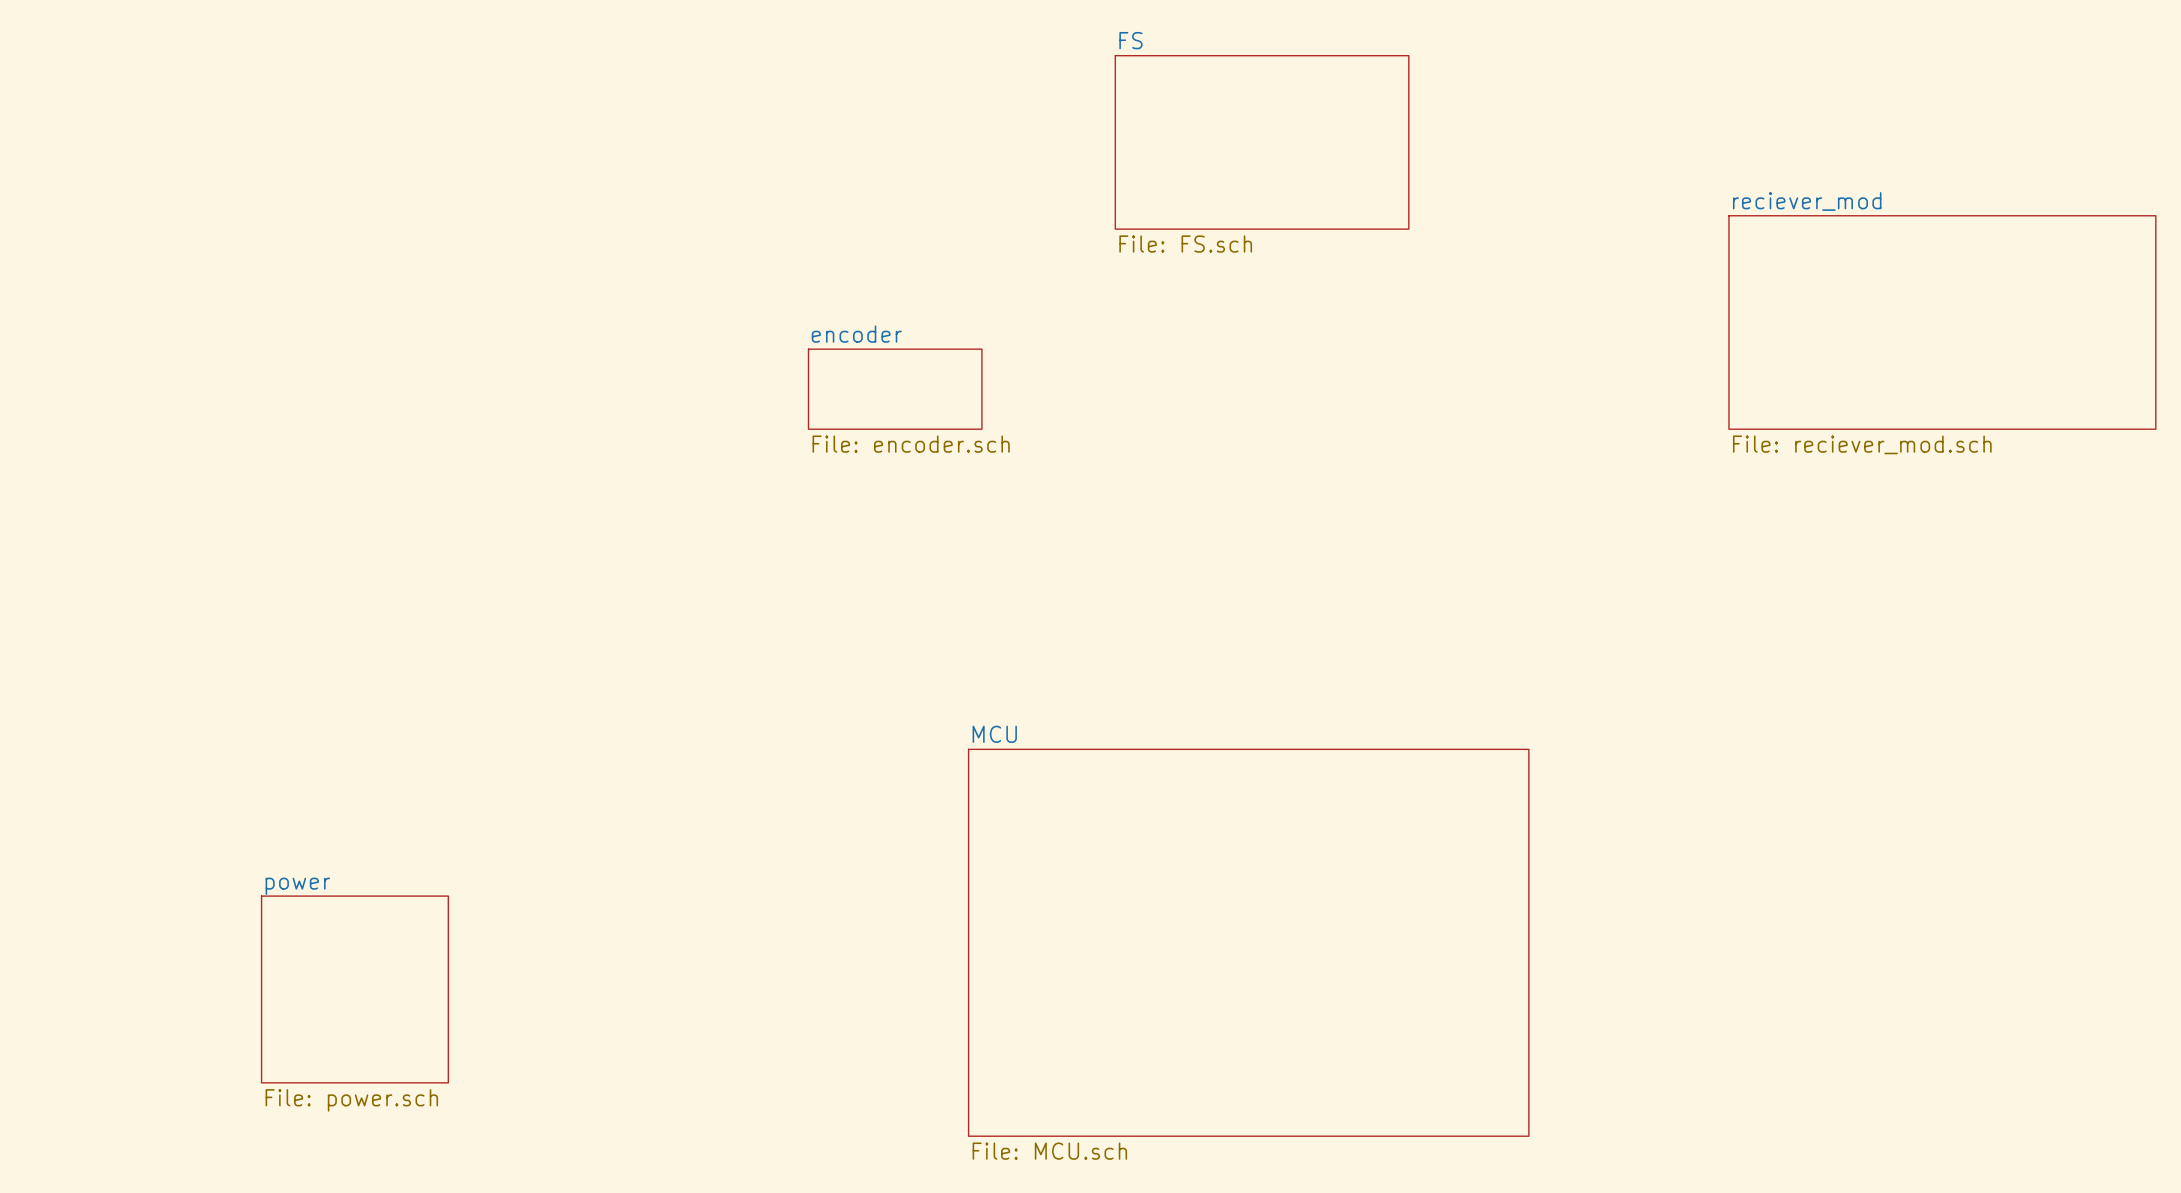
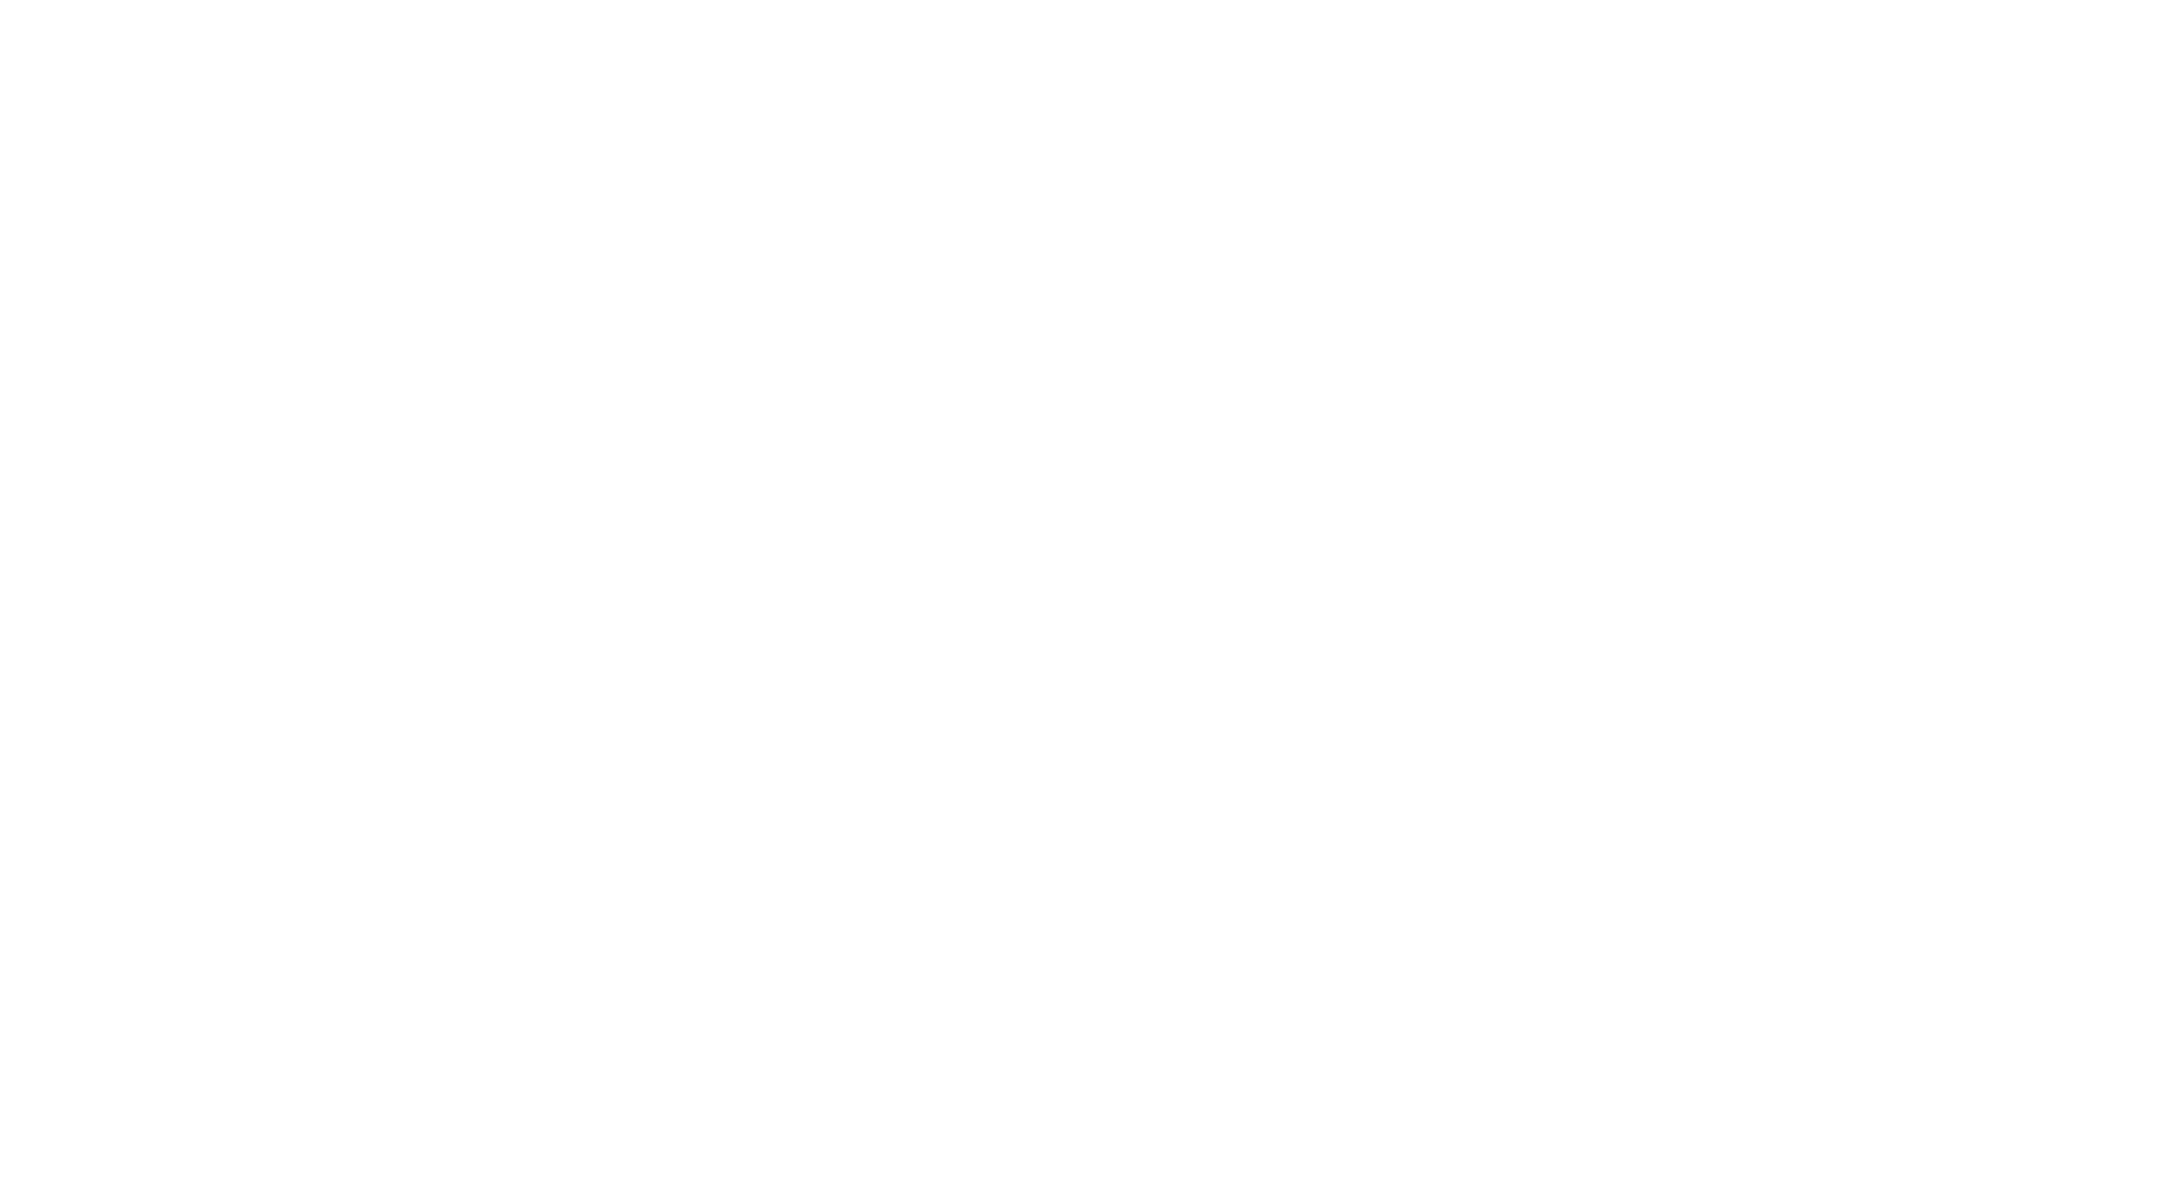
sheet FS: File: FS.sch (1262, 142) -> none
sheet reciever_mod: File: reciever_mod.sch (1942, 322) -> none
sheet encoder: File: encoder.sch (895, 389) -> none
sheet MCU: File: MCU.sch (1248, 942) -> none
sheet power: File: power.sch (354, 989) -> none

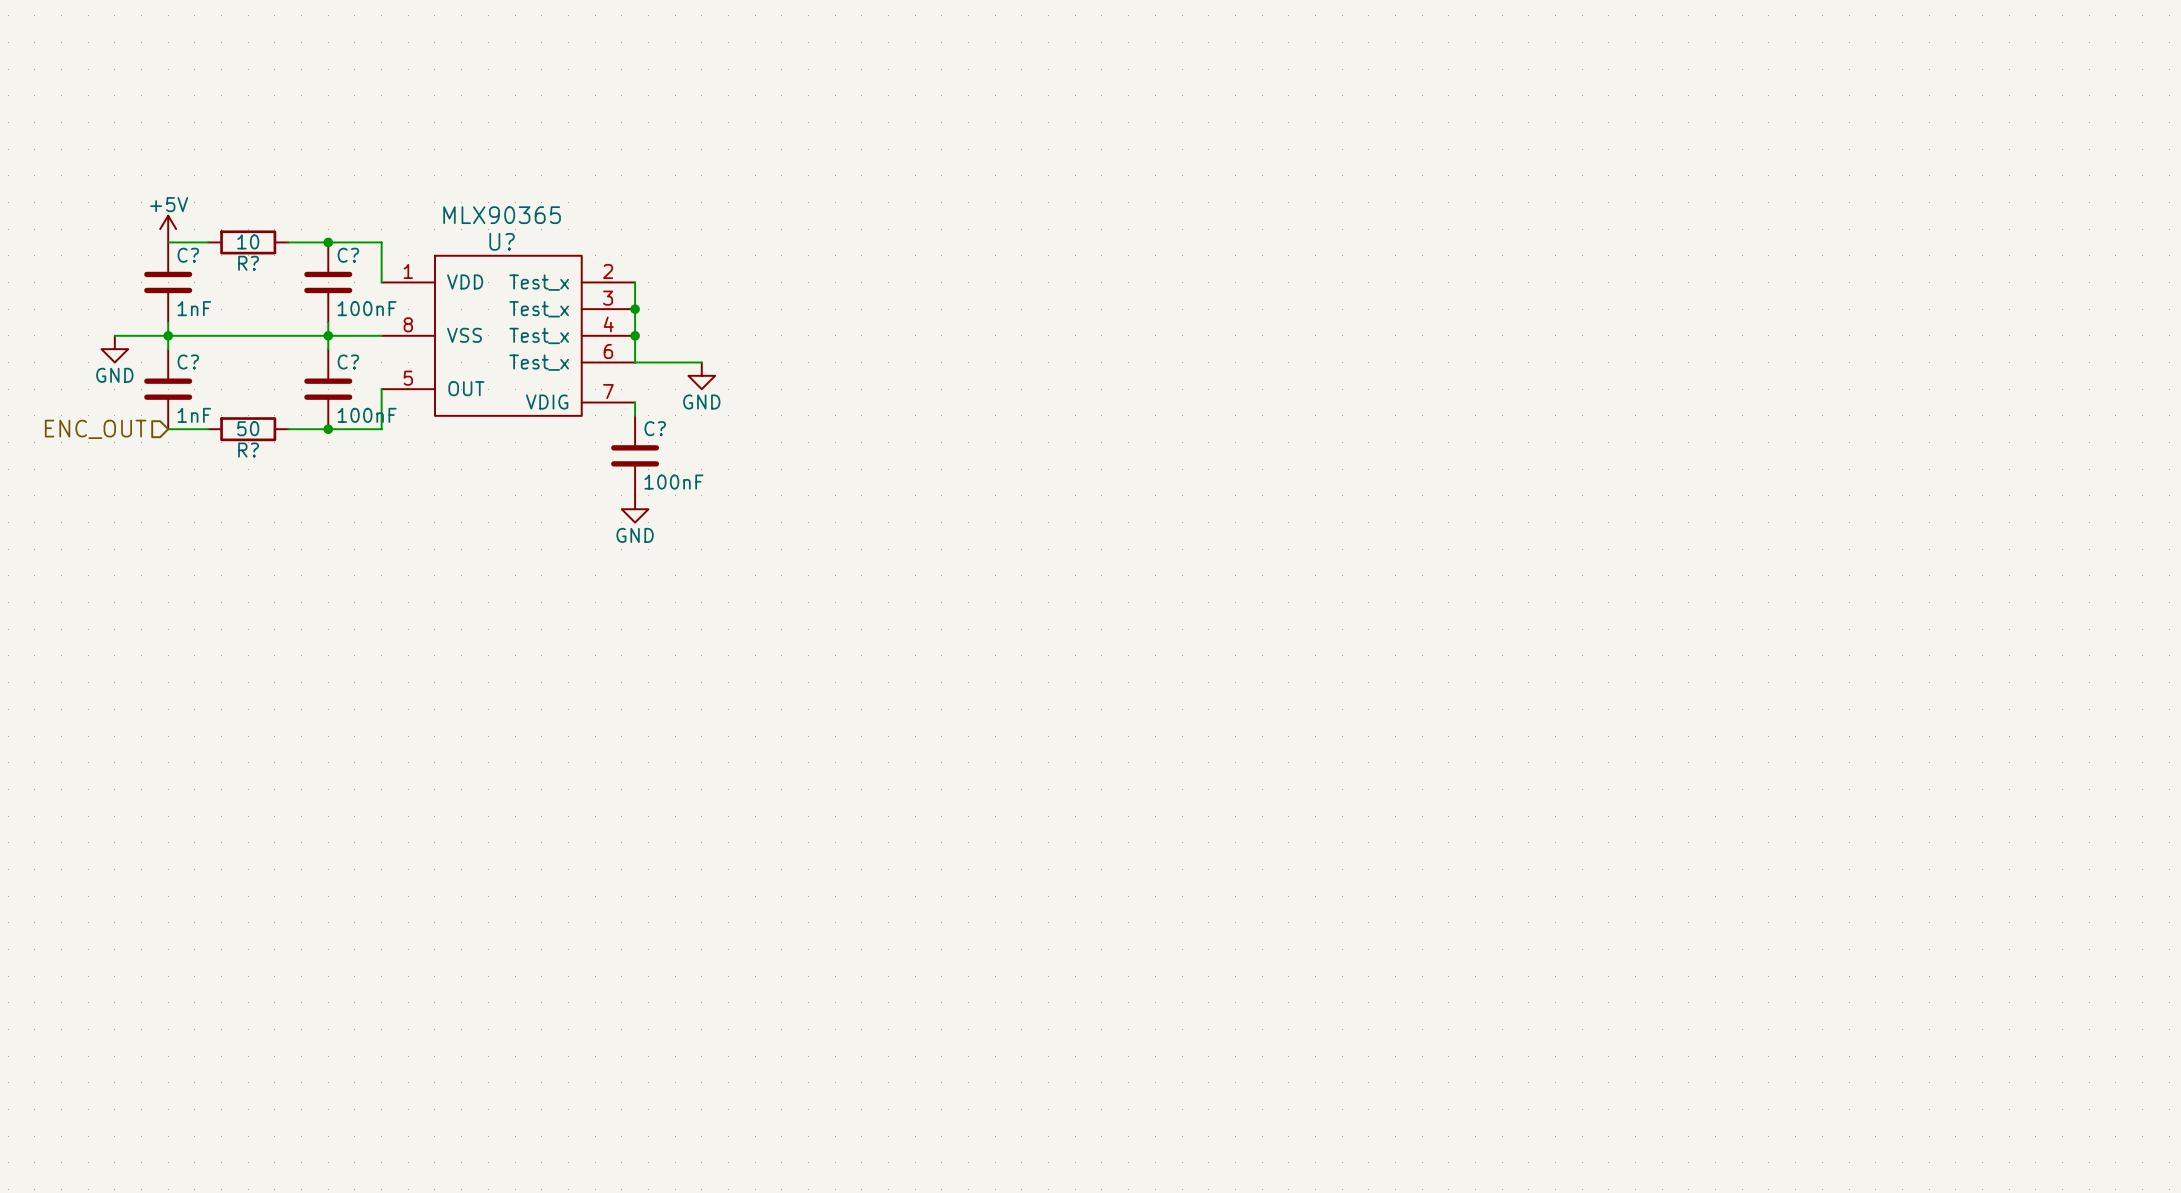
power symbol: none -> +5V (168, 229)
wire: none -> (168, 242) (208, 242)
R?: none -> 10 (248, 242)
wire: none -> (288, 242) (381, 242) (381, 282)
junction: none -> (328, 242)
C?: none -> 1nF (168, 282)
C?: none -> 100nF (328, 282)
wire: none -> (635, 282) (635, 362) (701, 362)
junction: none -> (635, 309)
wire: none -> (168, 322) (168, 349)
wire: none -> (328, 322) (328, 349)
wire: none -> (114, 335) (381, 335)
junction: none -> (168, 335)
junction: none -> (328, 335)
U?: none -> MLX90365 (508, 335)
junction: none -> (635, 335)
power symbol: none -> GND (114, 349)
power symbol: none -> GND (701, 375)
C?: none -> 1nF (168, 389)
C?: none -> 100nF (328, 389)
wire: none -> (381, 389) (381, 429) (288, 429)
wire: none -> (635, 402) (635, 415)
hierarchical label: none -> ENC_OUT (95, 429)
wire: none -> (168, 429) (208, 429)
R?: none -> 50 (248, 429)
junction: none -> (328, 429)
C?: none -> 100nF (635, 455)
power symbol: none -> GND (635, 509)

